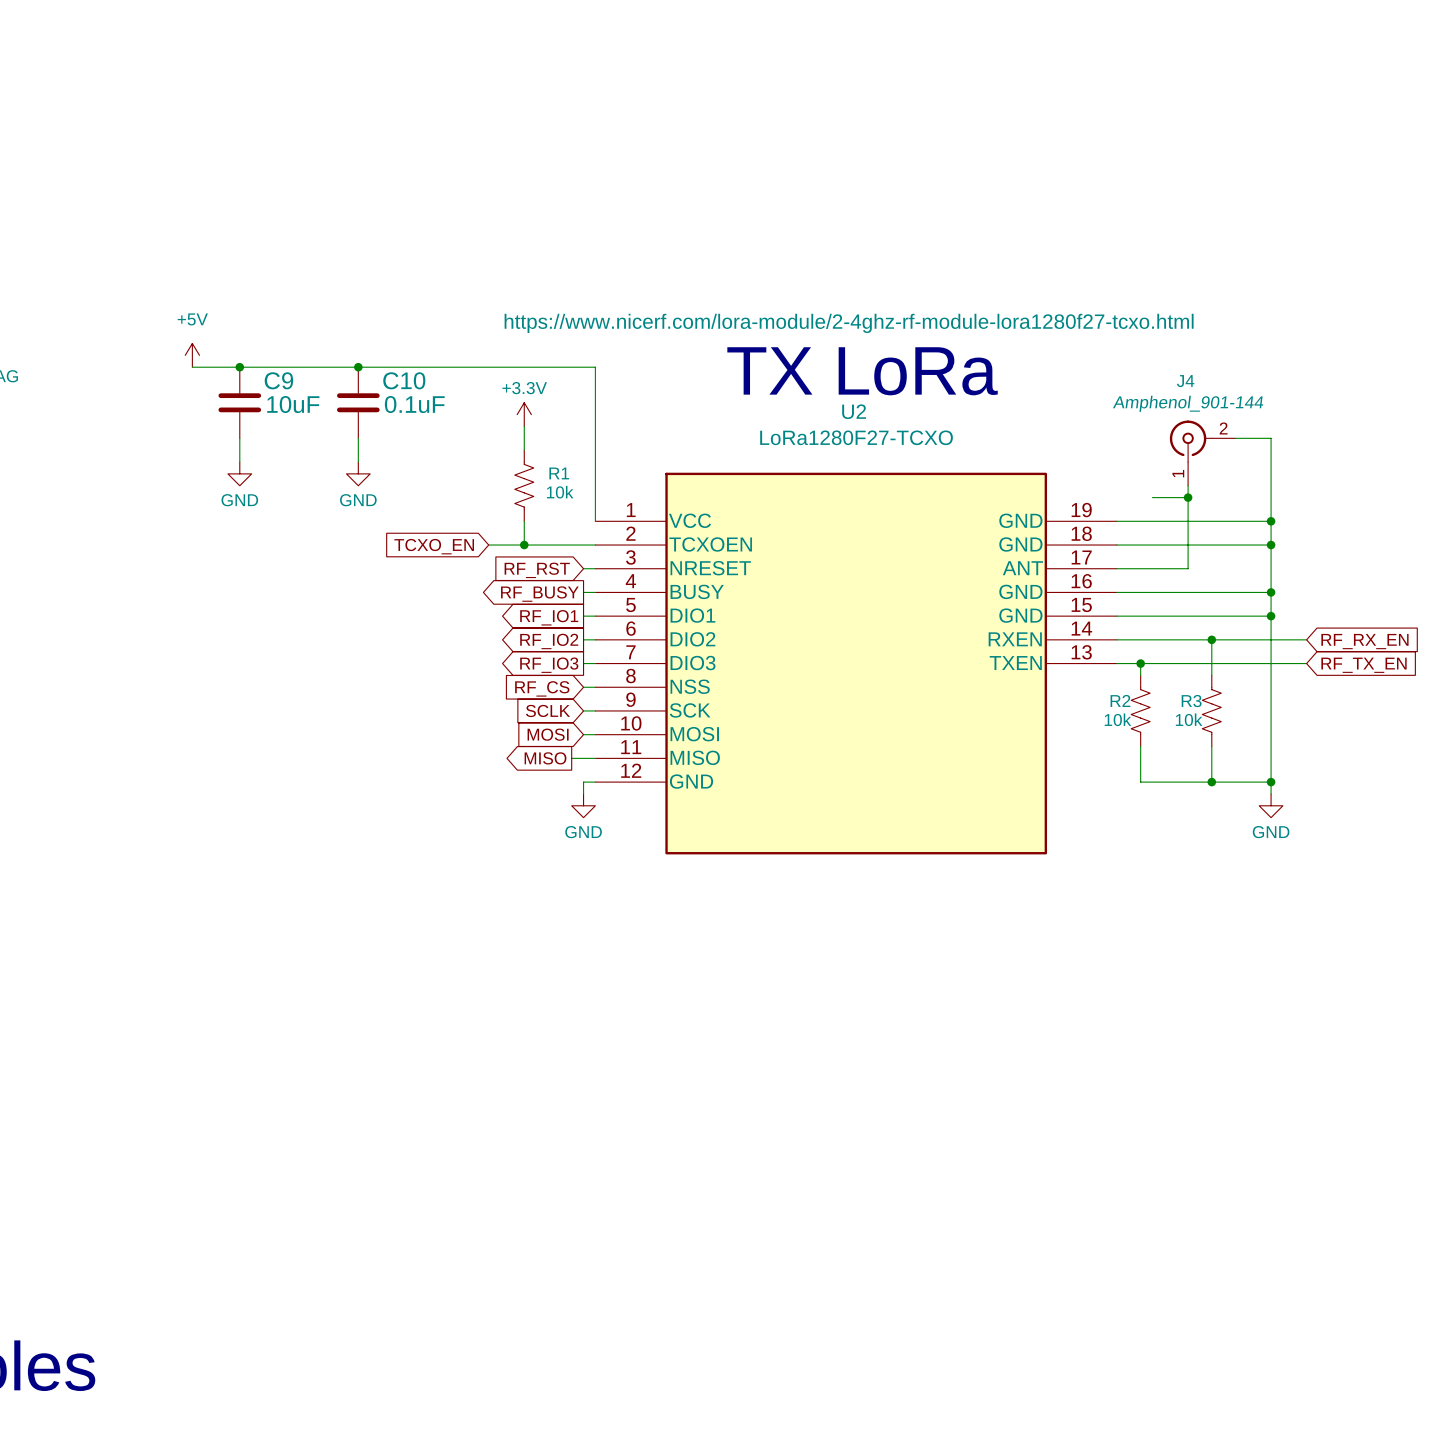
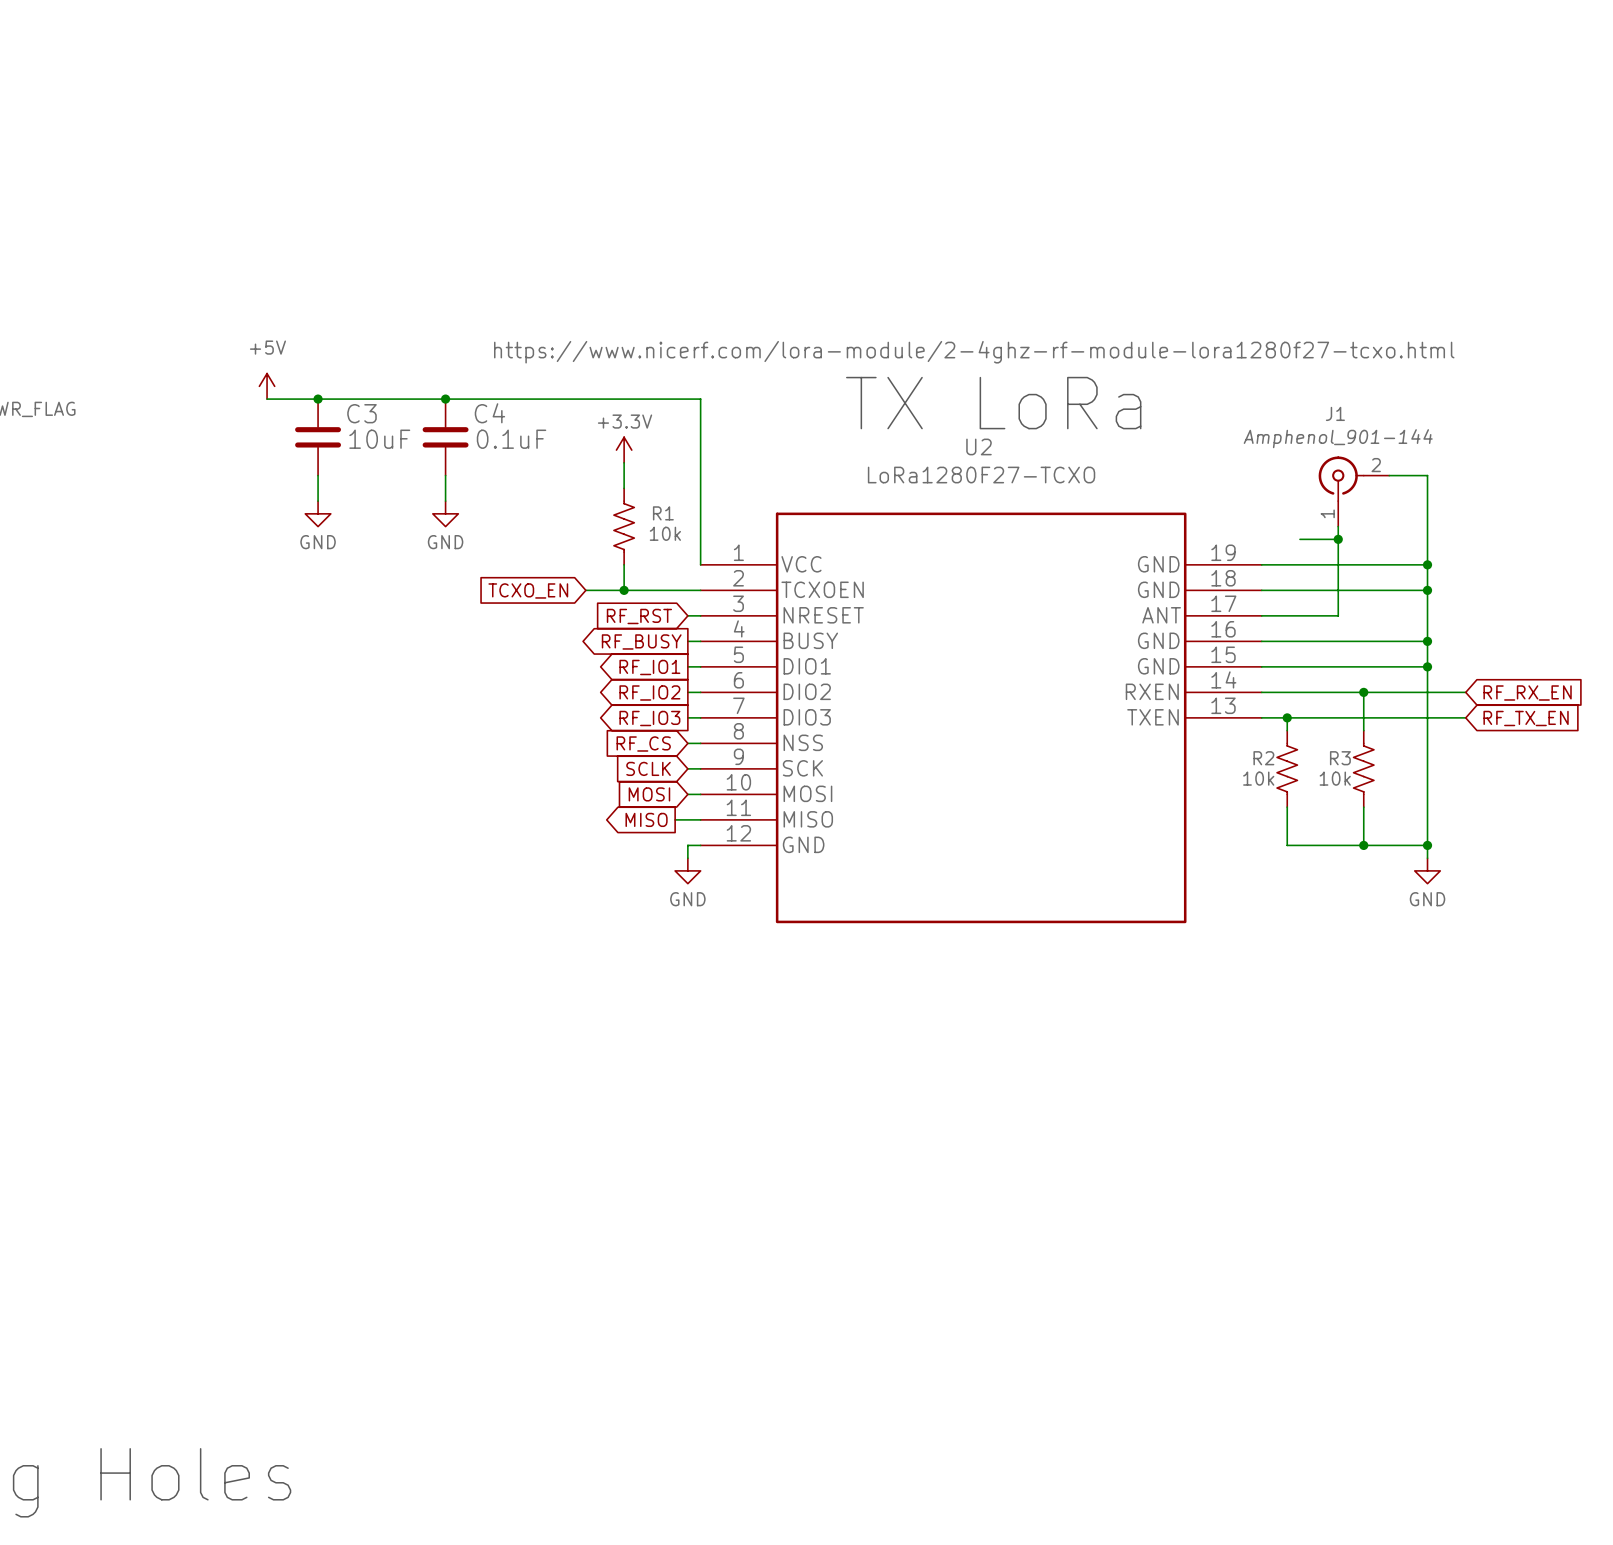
C9 name: C9 (278, 380) -> C3 (361, 413)
C10 name: C10 (404, 380) -> C4 (489, 413)
J4 name: J4 (1185, 381) -> J1 (1335, 413)

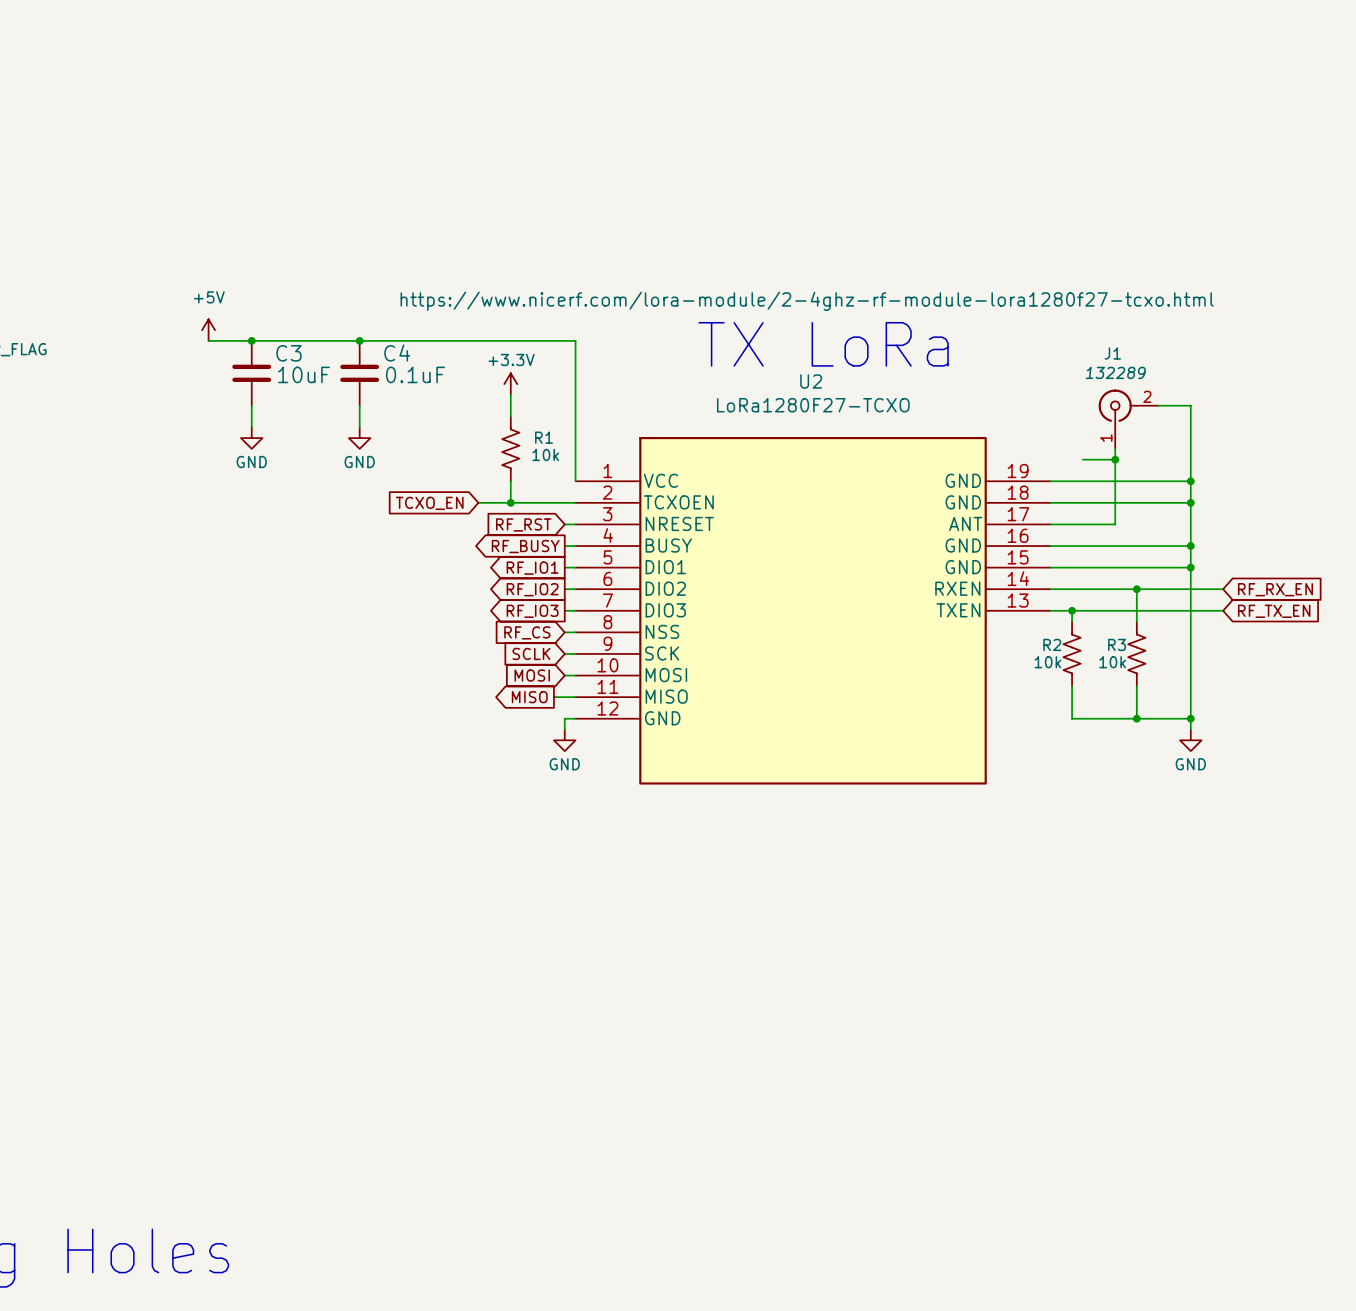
J1 value: Amphenol_901-144 (1338, 438) -> 132289 (1115, 372)

